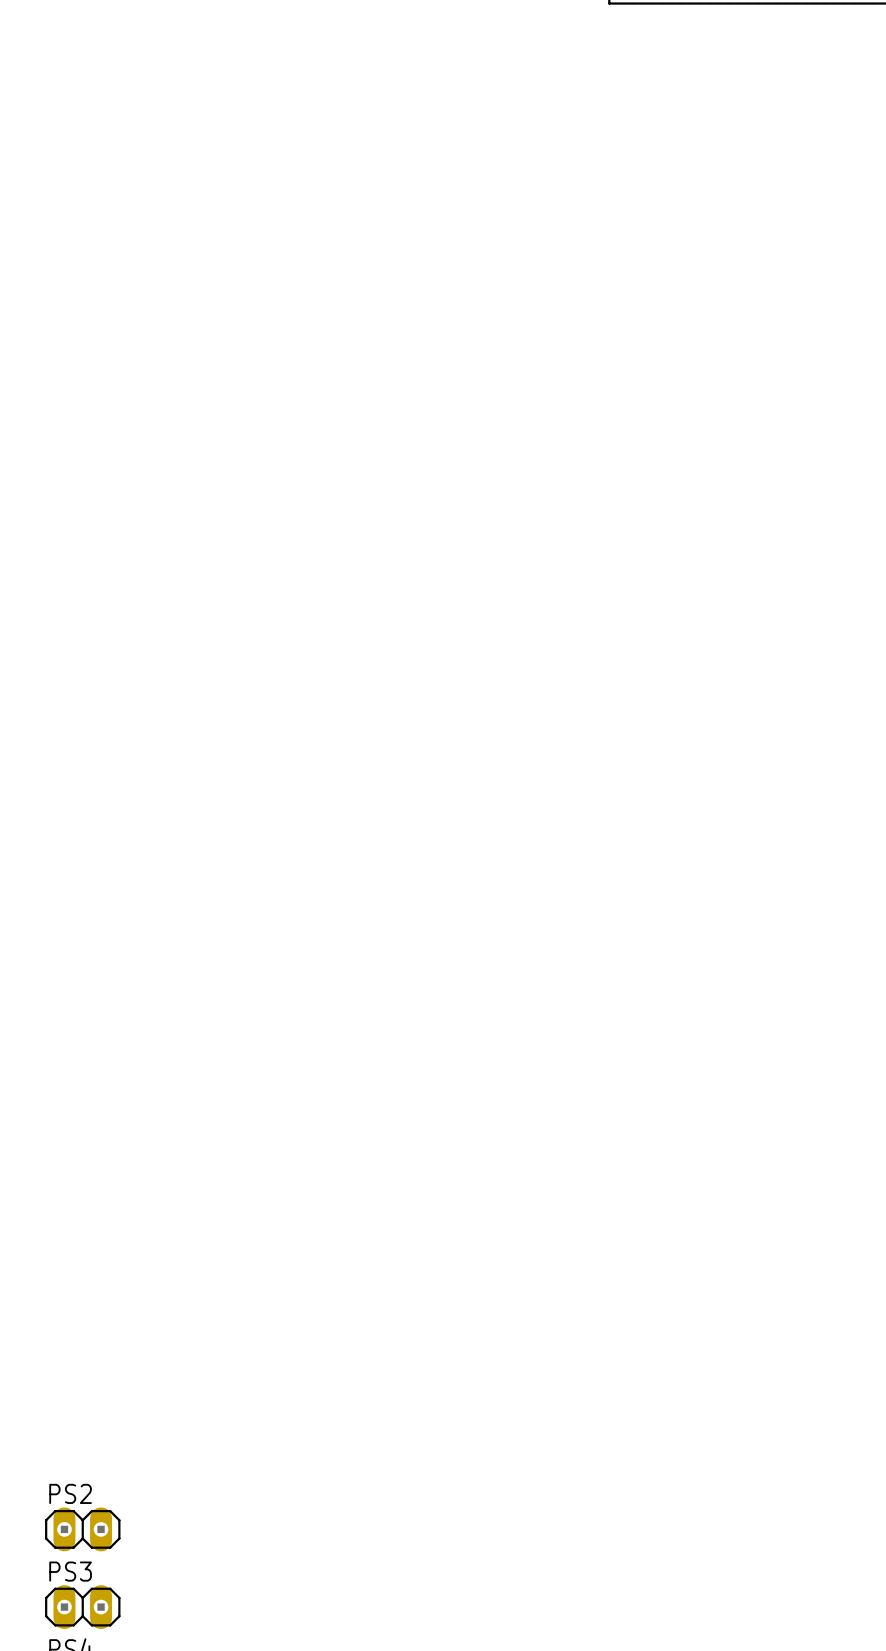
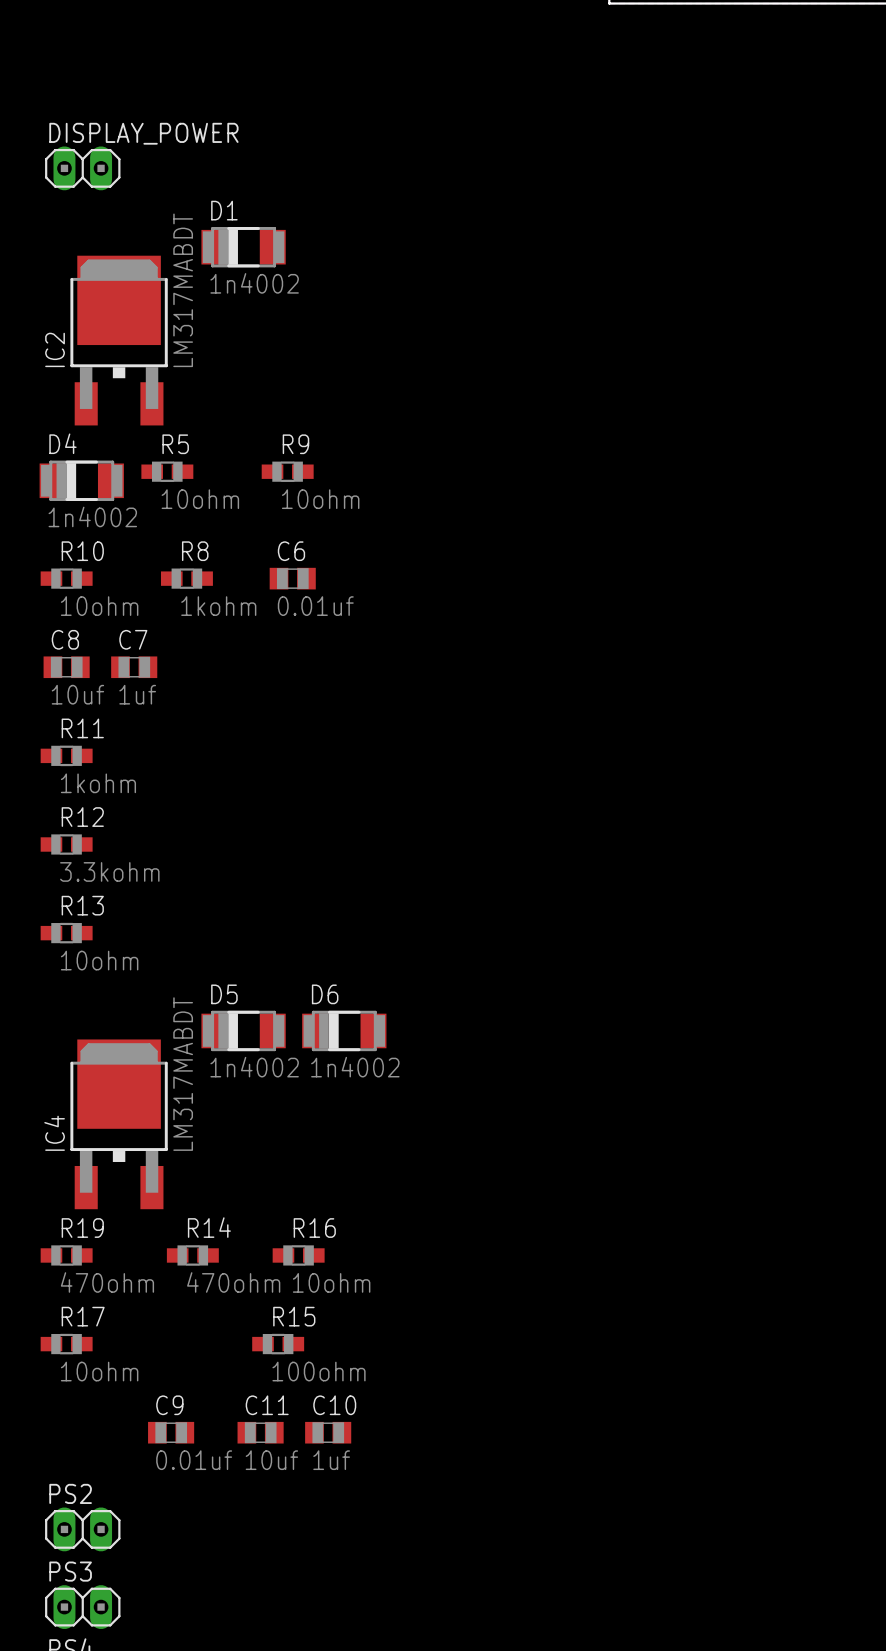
DISPLAY_POWER: none -> (82, 168)
D1: none -> 1n4002 (243, 247)
IC2: none -> LM317MABDT (119, 340)
R5: none -> 10ohm (167, 471)
R9: none -> 10ohm (287, 471)
D4: none -> 1n4002 (81, 480)
R10: none -> 10ohm (66, 578)
R8: none -> 1kohm (186, 578)
C6: none -> 0.01uf (292, 578)
C8: none -> 10uf (66, 667)
C7: none -> 1uf (134, 667)
R11: none -> 1kohm (66, 755)
R12: none -> 3.3kohm (66, 844)
R13: none -> 10ohm (66, 933)
D5: none -> 1n4002 (243, 1030)
D6: none -> 1n4002 (344, 1030)
IC4: none -> LM317MABDT (119, 1124)
R19: none -> 470ohm (66, 1255)
R14: none -> 470ohm (192, 1255)
R16: none -> 10ohm (298, 1255)
R17: none -> 10ohm (66, 1344)
R15: none -> 100ohm (278, 1344)
C9: none -> 0.01uf (171, 1432)
C11: none -> 10uf (260, 1432)
C10: none -> 1uf (328, 1432)

